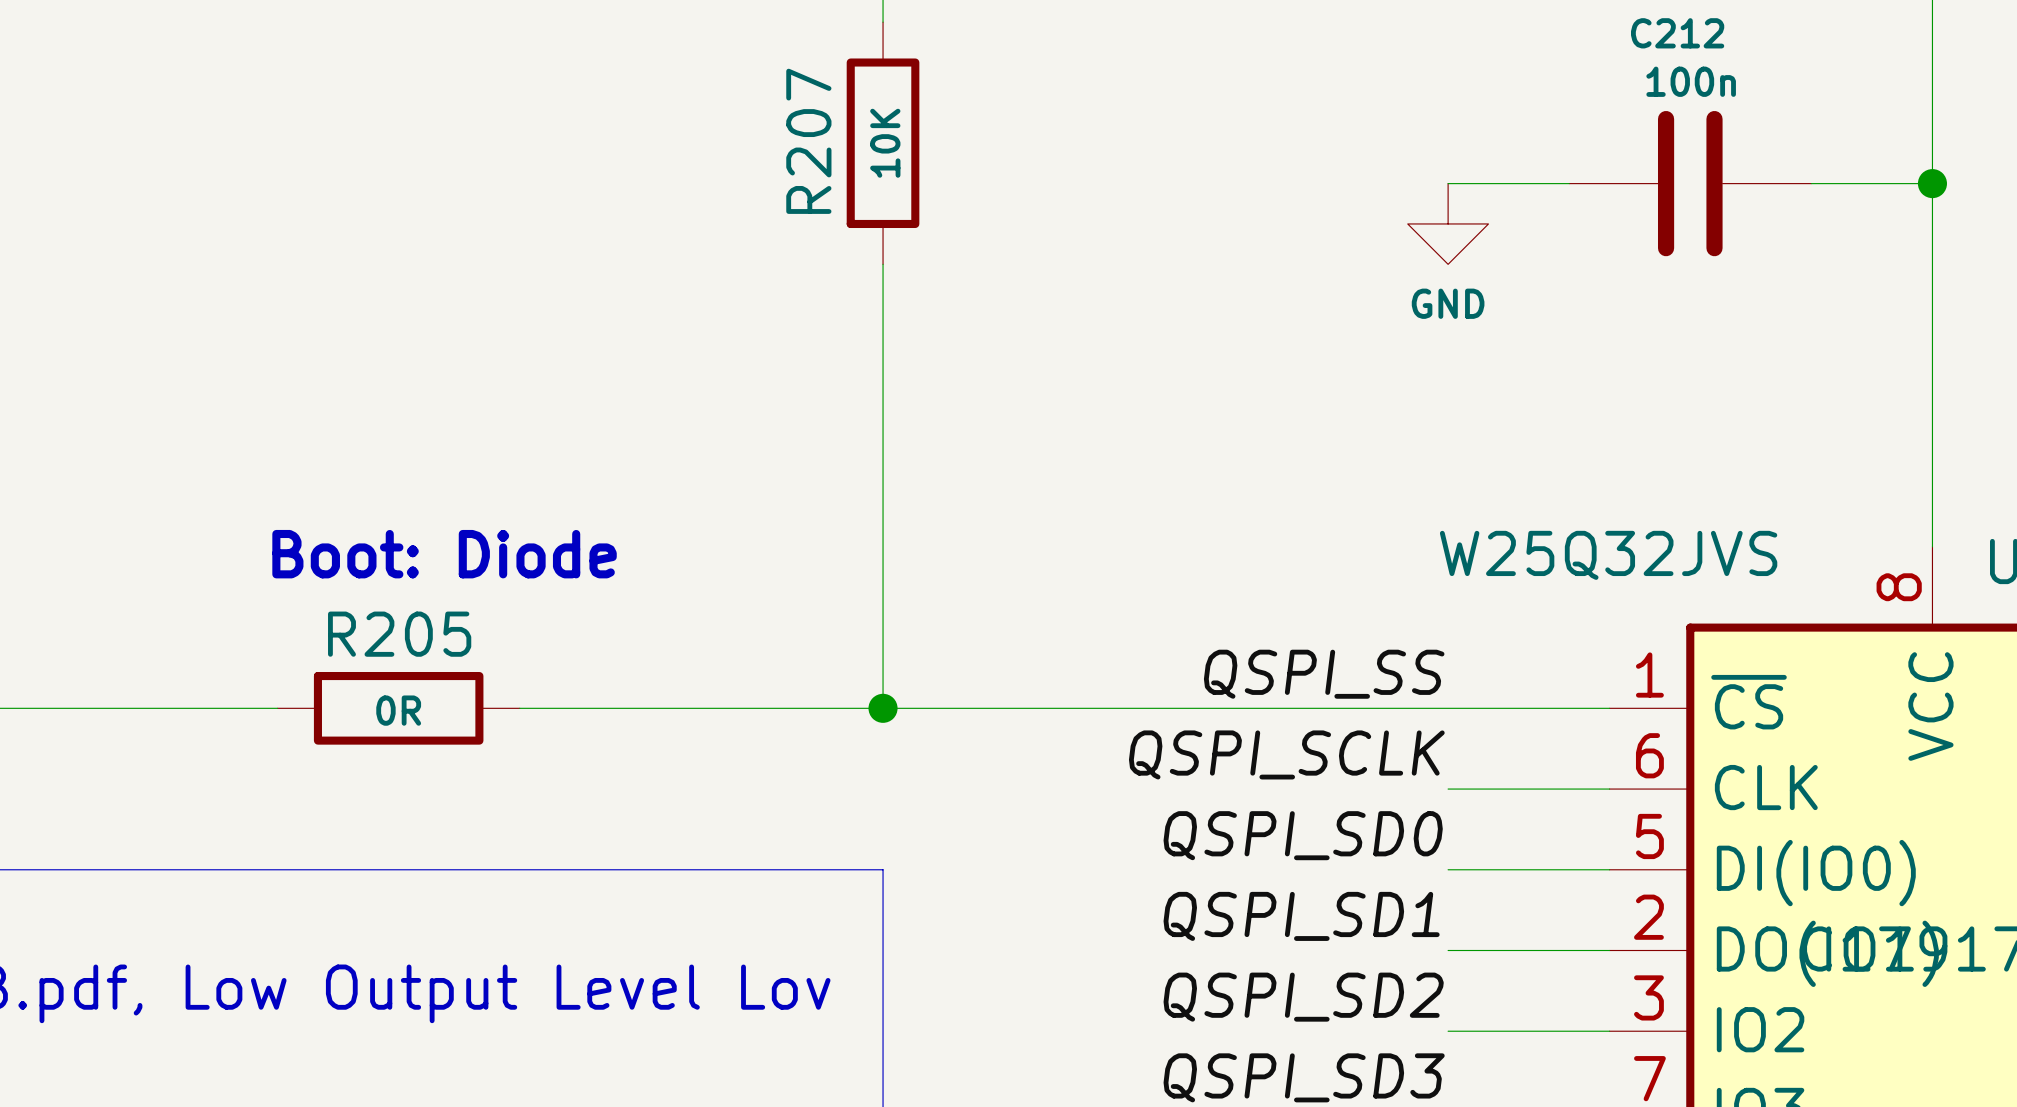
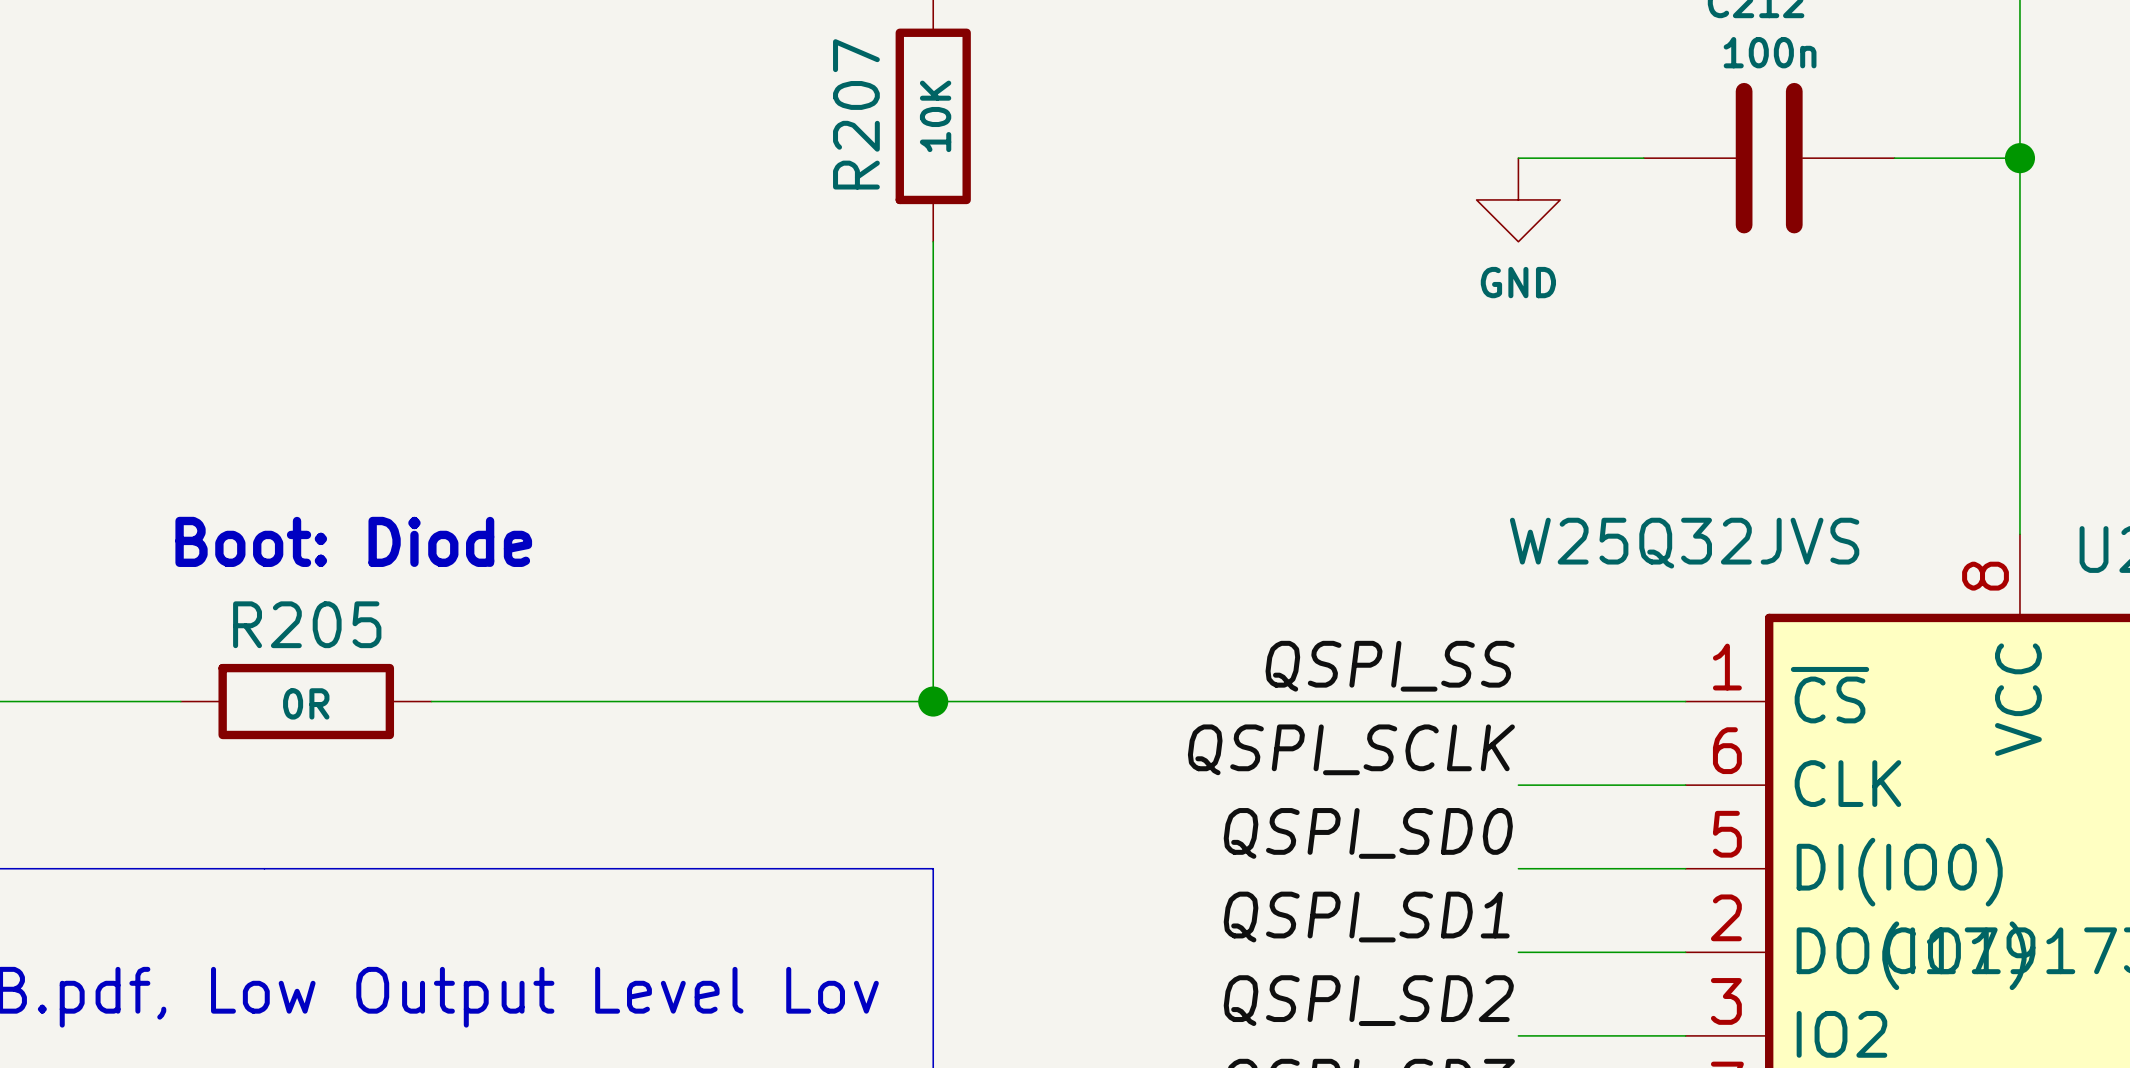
text position: Boot: Diode (444, 554) -> Boot: Diode (353, 541)
wire: (156, 708) (277, 708) -> (431, 701) (557, 701)
R205 position: (398, 708) -> (306, 701)

